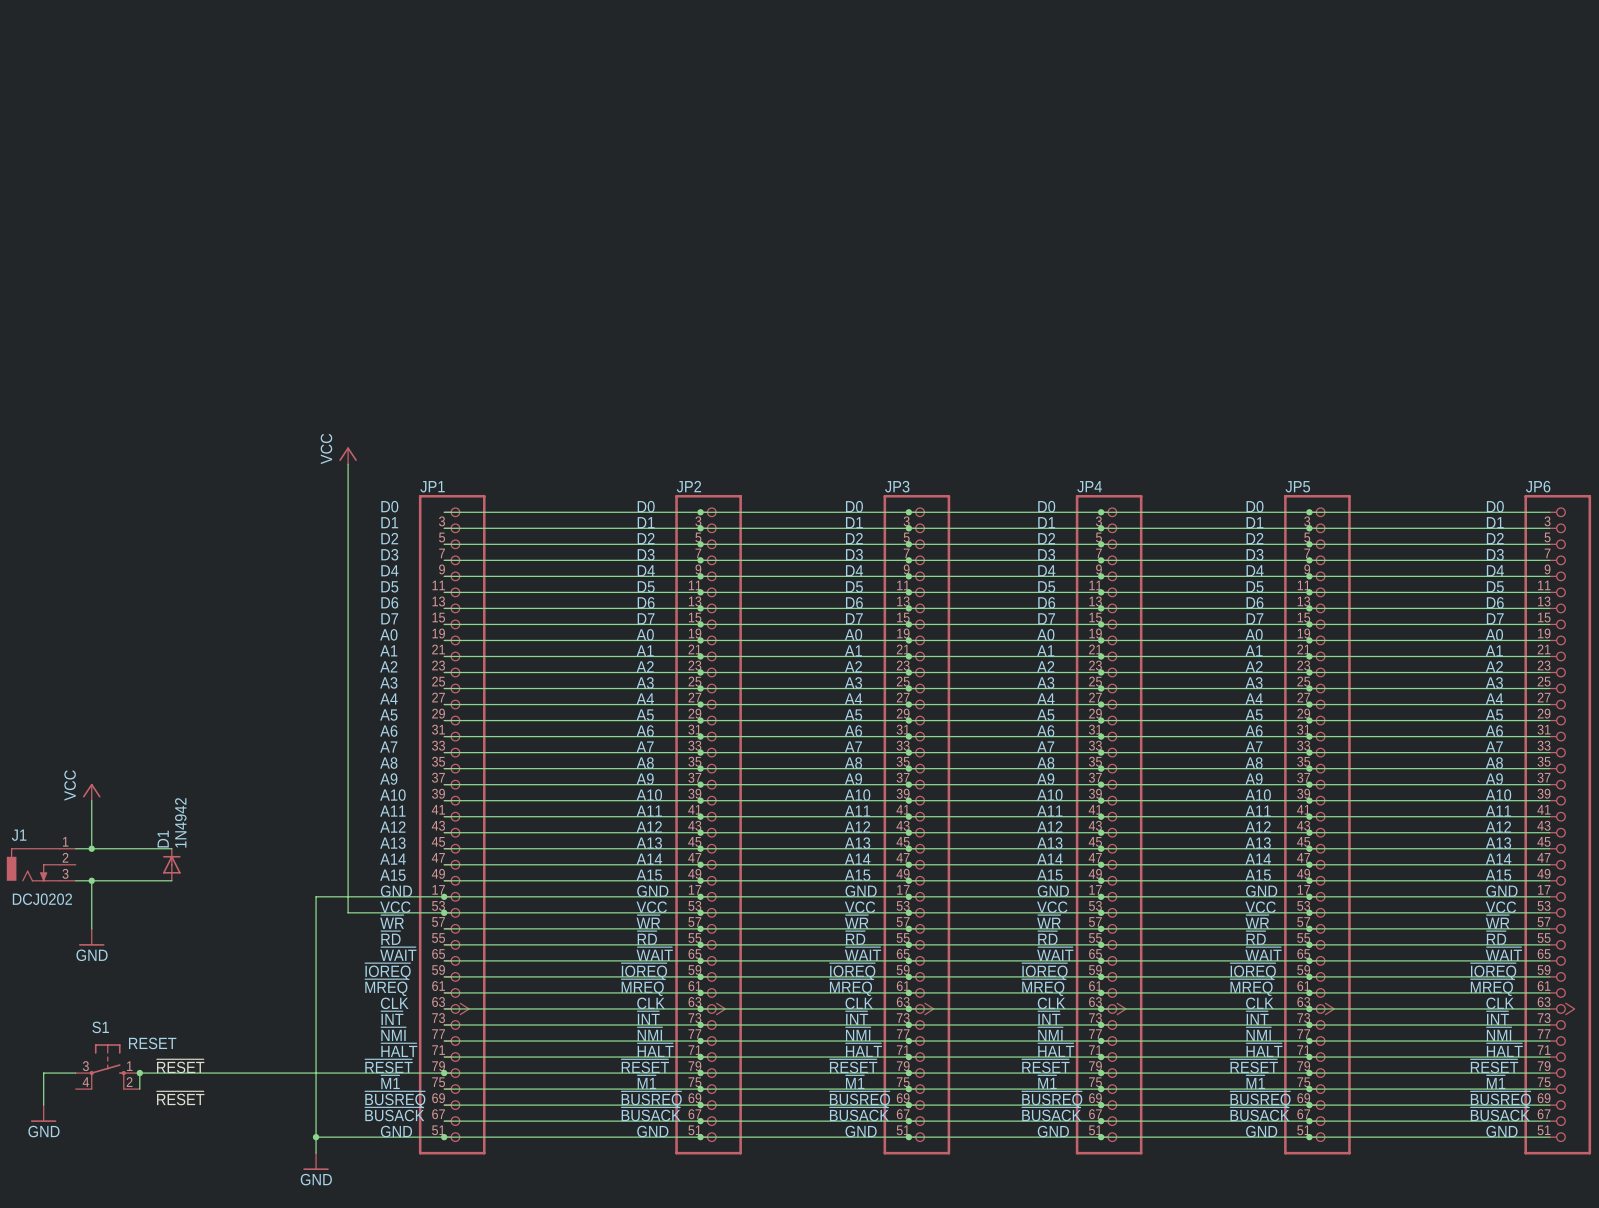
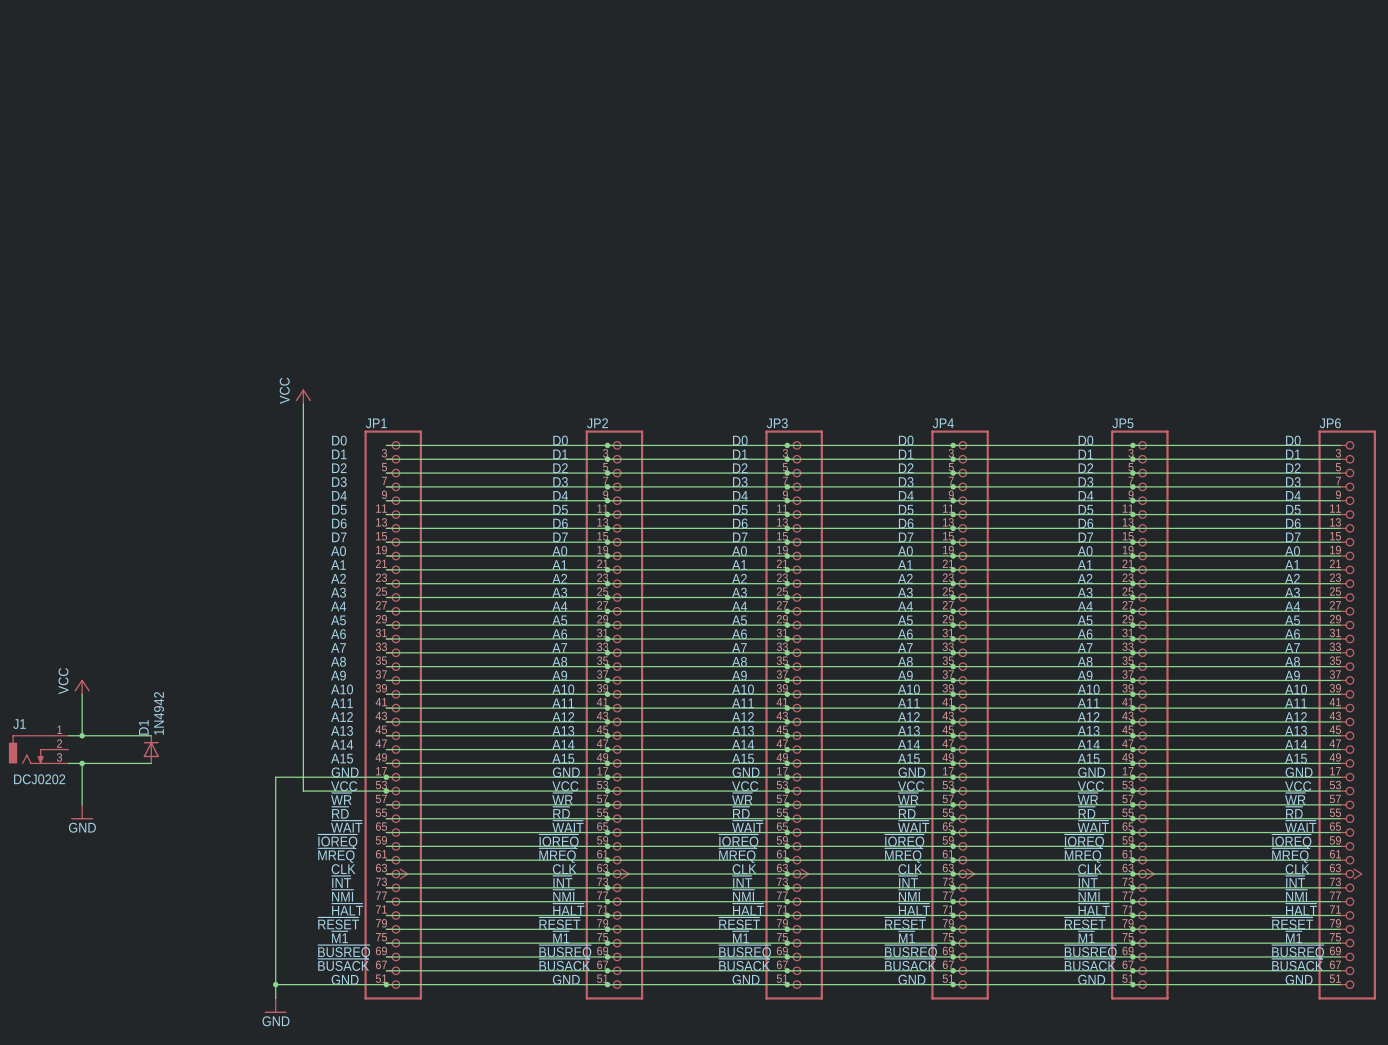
S1: RESET (107, 1066) -> none
label: ~{RESET} (180, 1066) -> none
wire: (75, 1073) (43, 1073) (43, 1105) -> none
junction: (139, 1073) -> none
wire: (444, 1073) (139, 1073) (139, 1089) -> none
junction: (444, 1073) -> none
label: ~{RESET} (180, 1098) -> none
power symbol: GND (43, 1113) -> none

